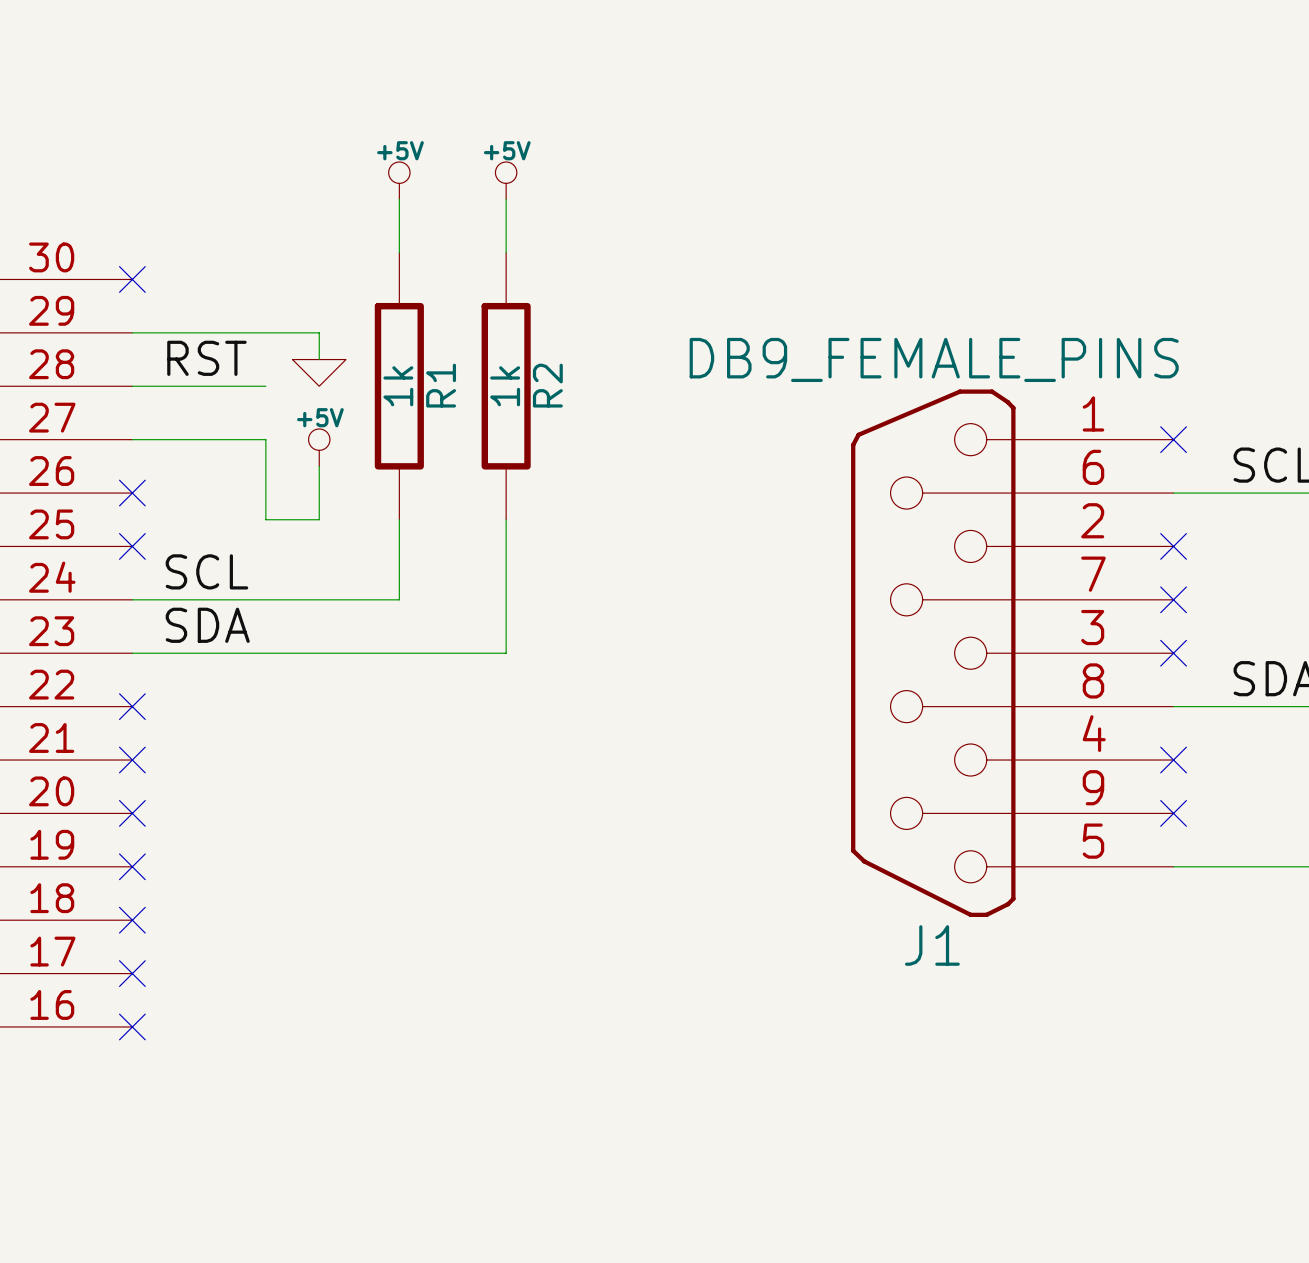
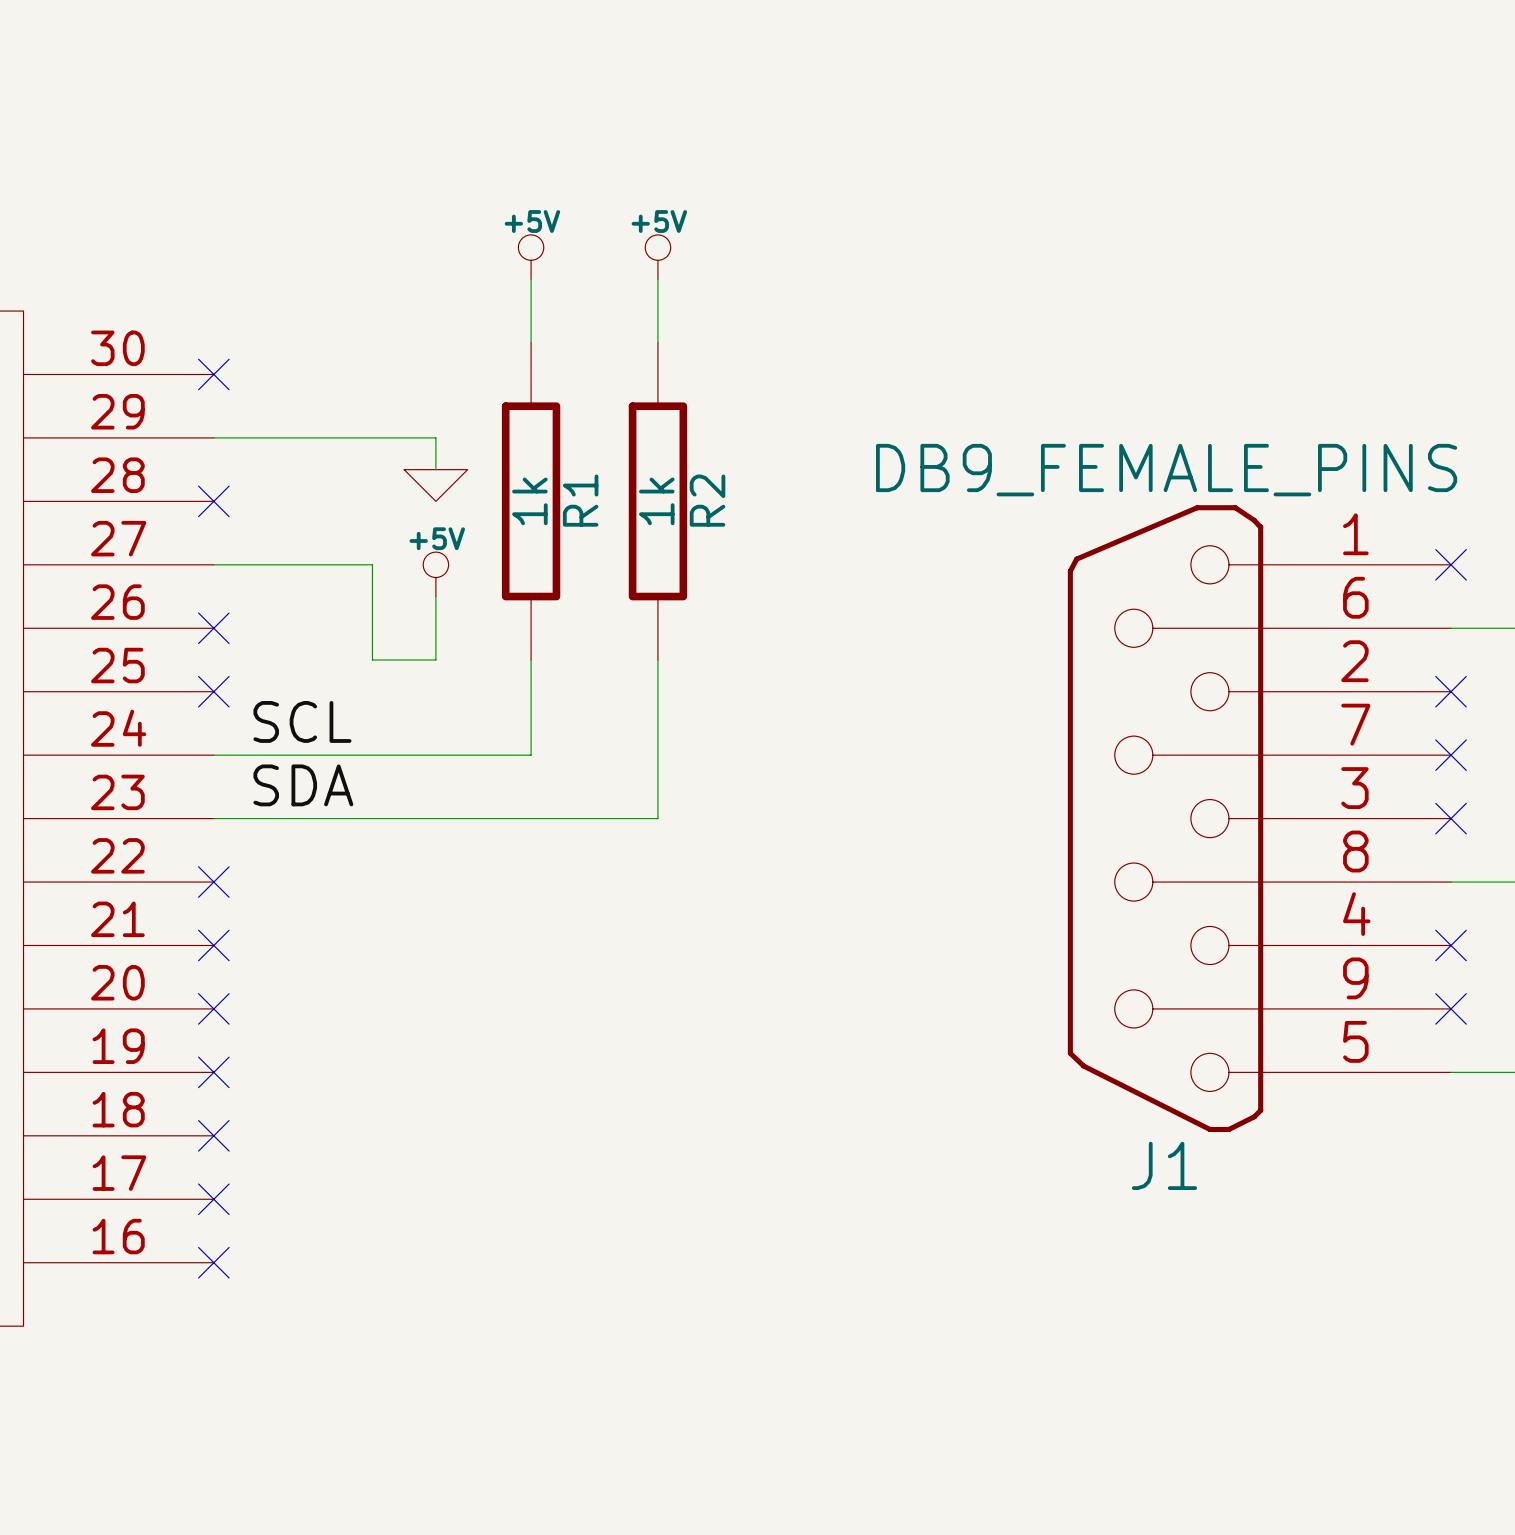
label: RST (206, 358) -> none
wire: (132, 386) (265, 386) -> none
no-connect mark: none -> (213, 501)

